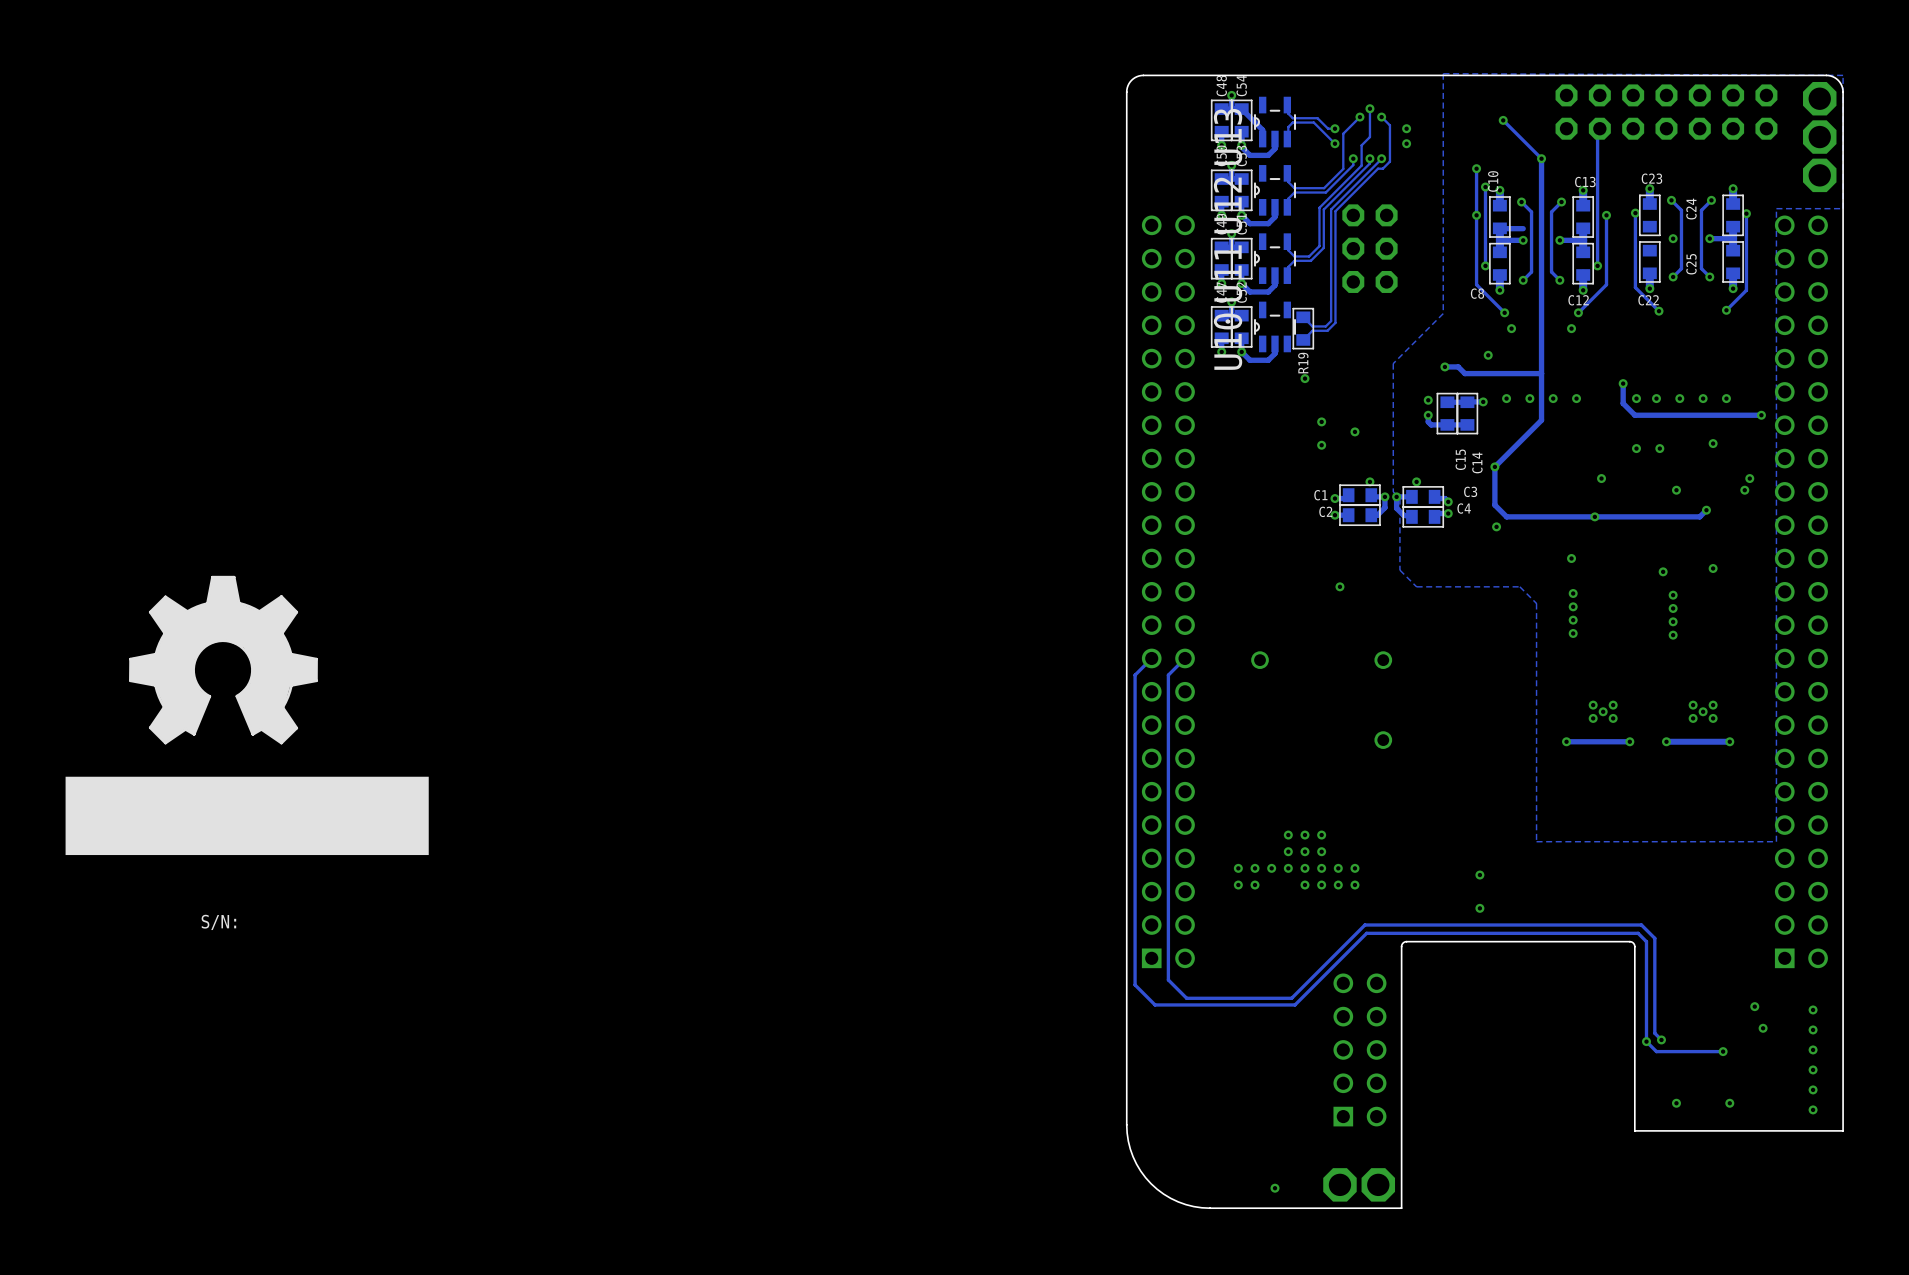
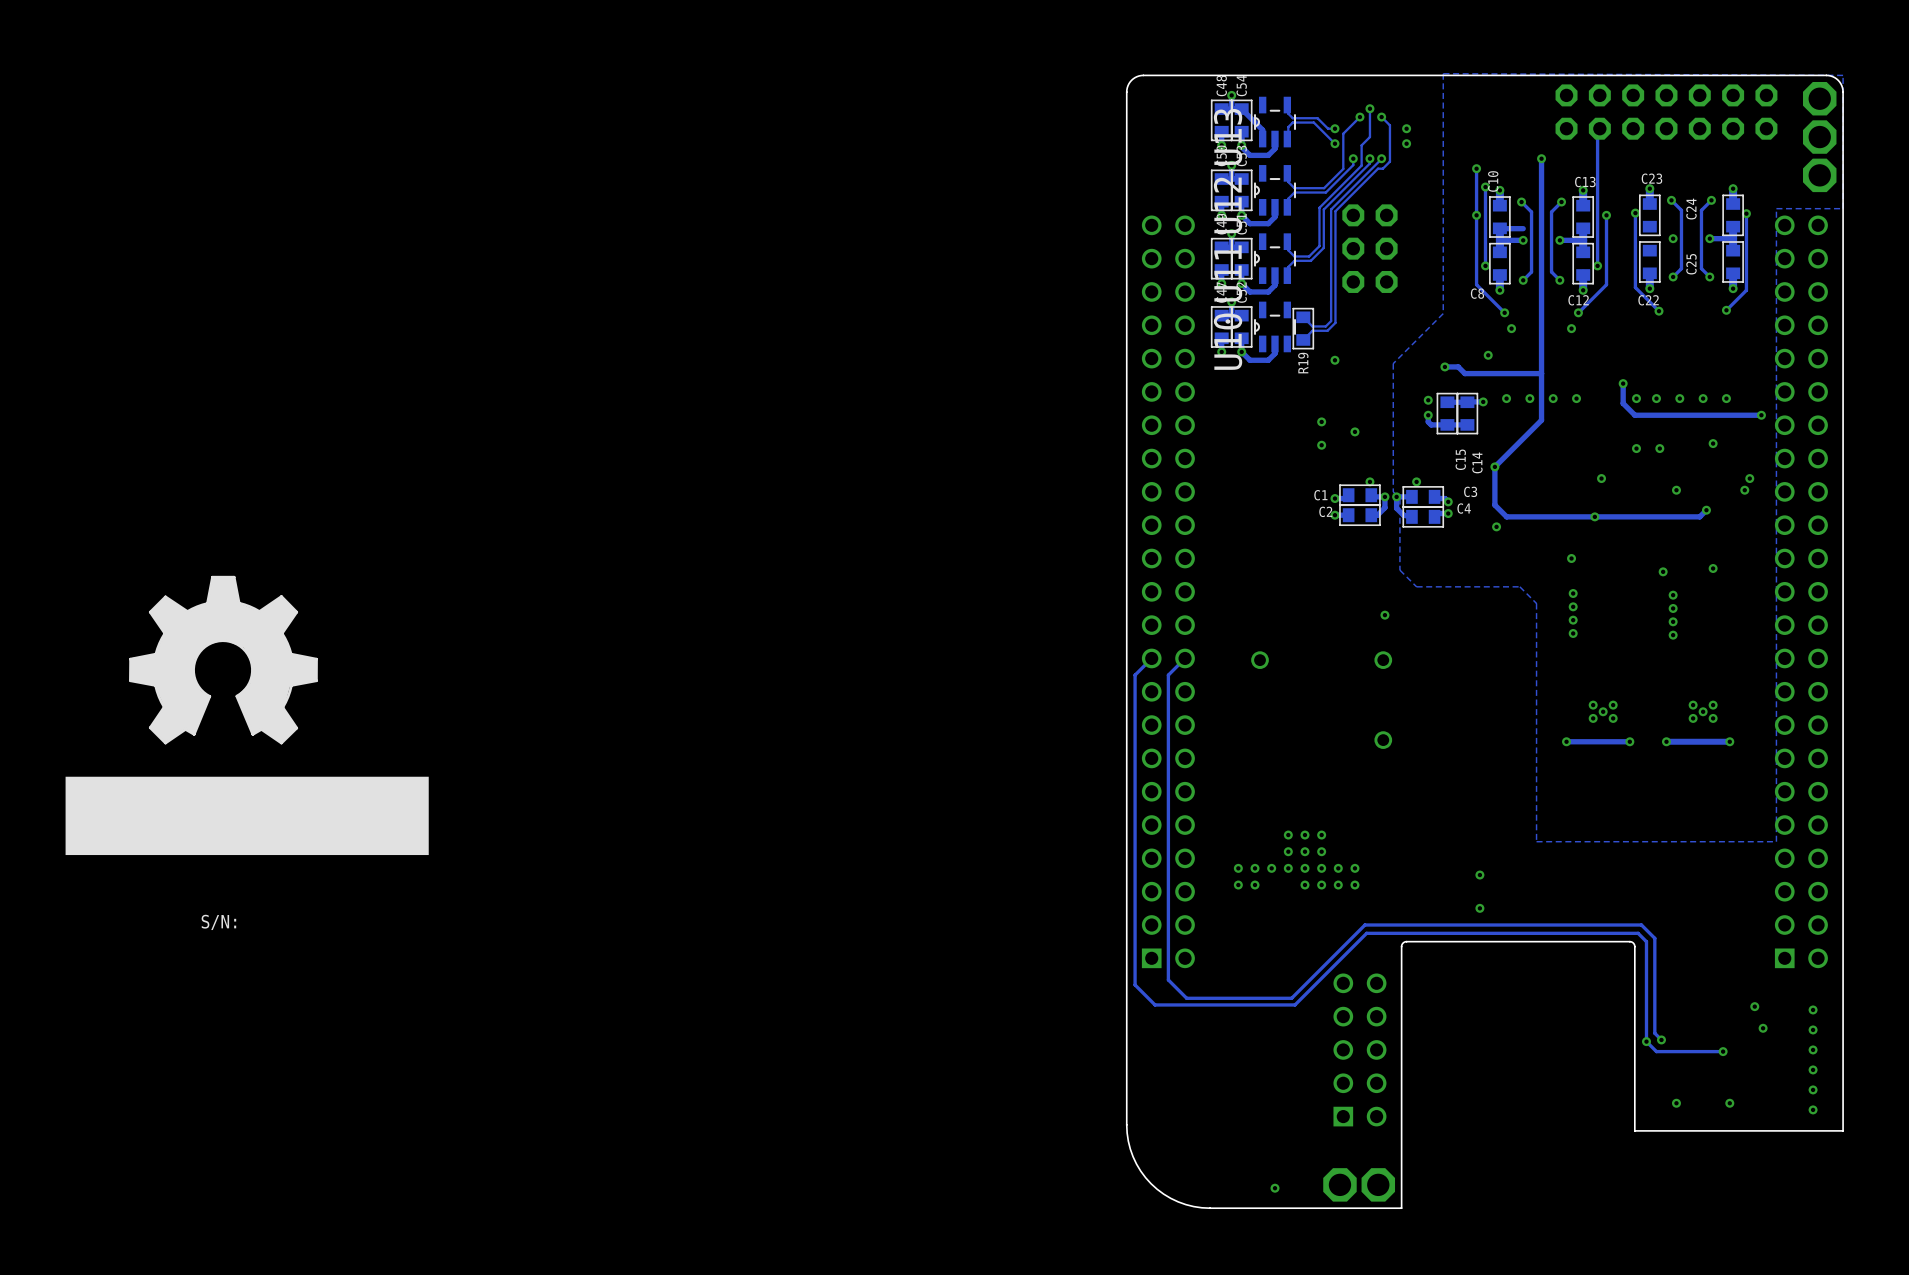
track: (1503, 120) (1541, 158) -> none
via: (1503, 120) -> none
via position: (1304, 378) -> (1334, 360)
via position: (1339, 586) -> (1384, 615)

